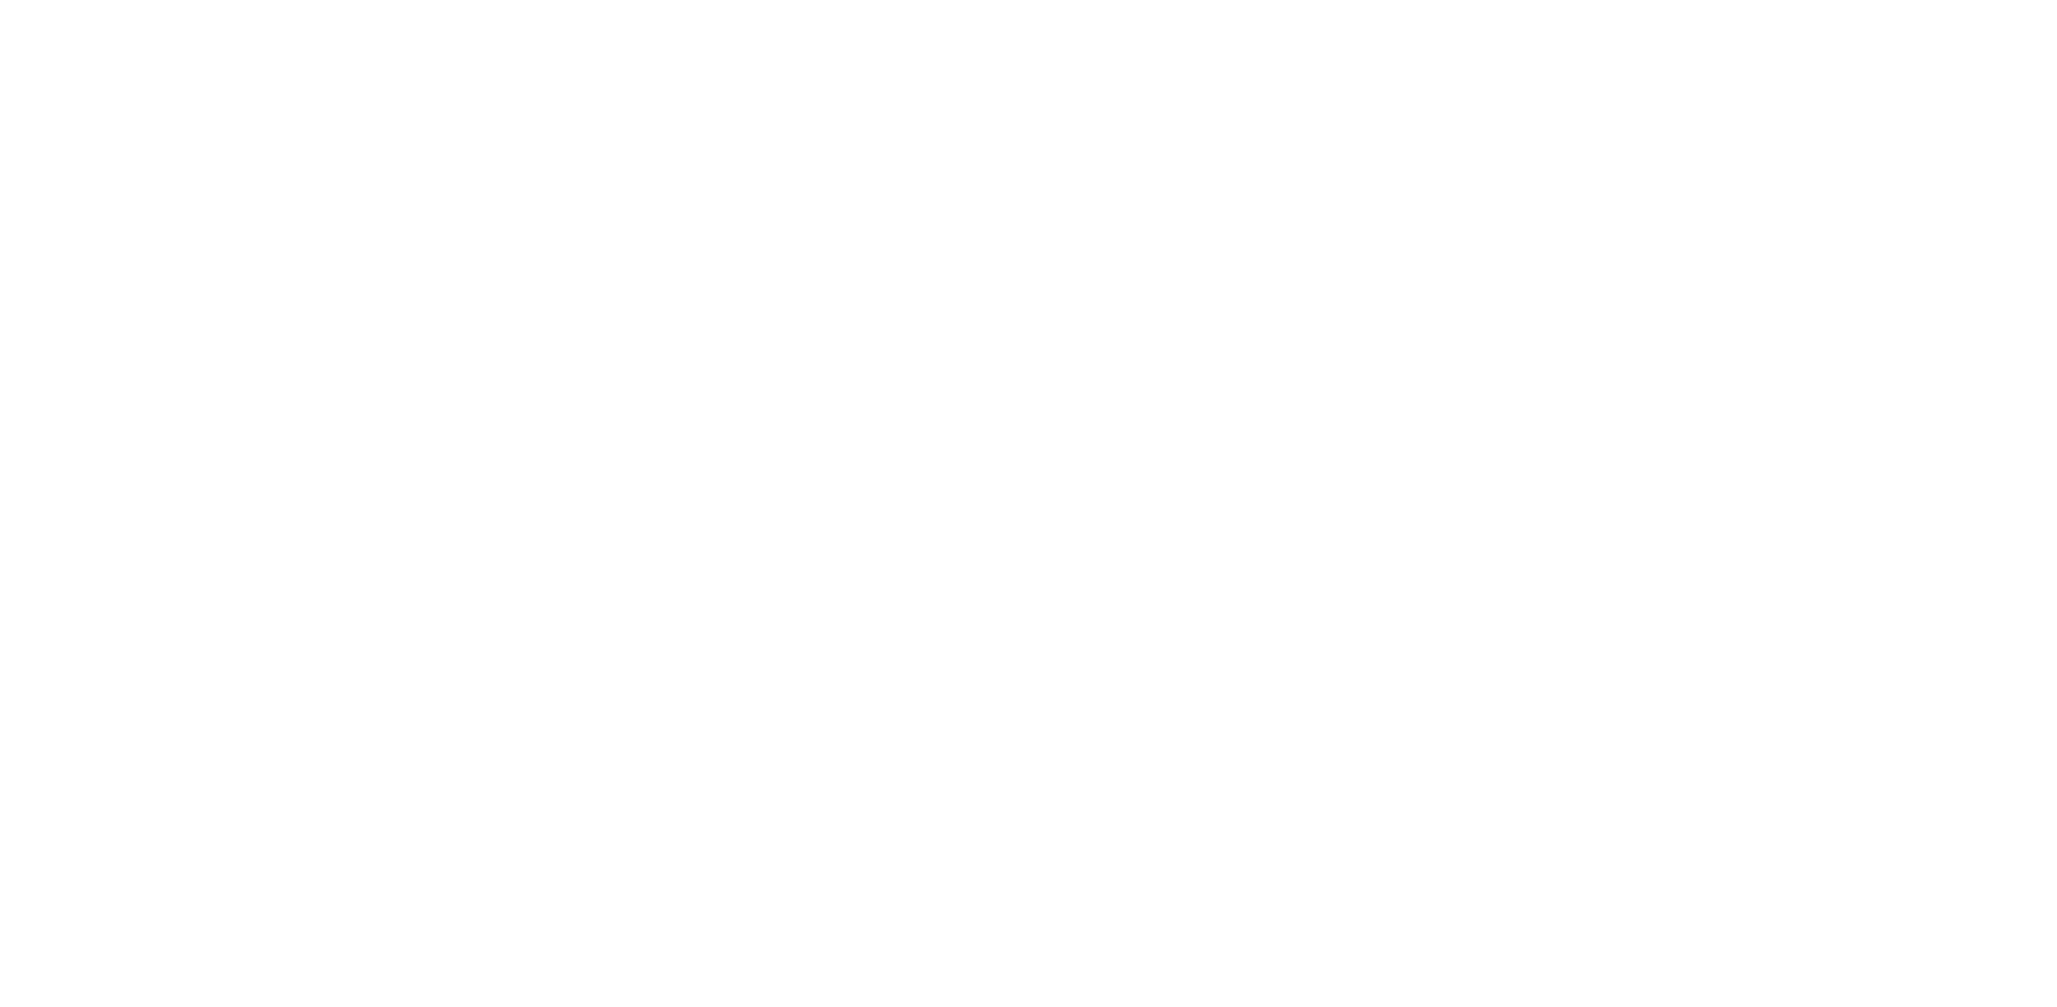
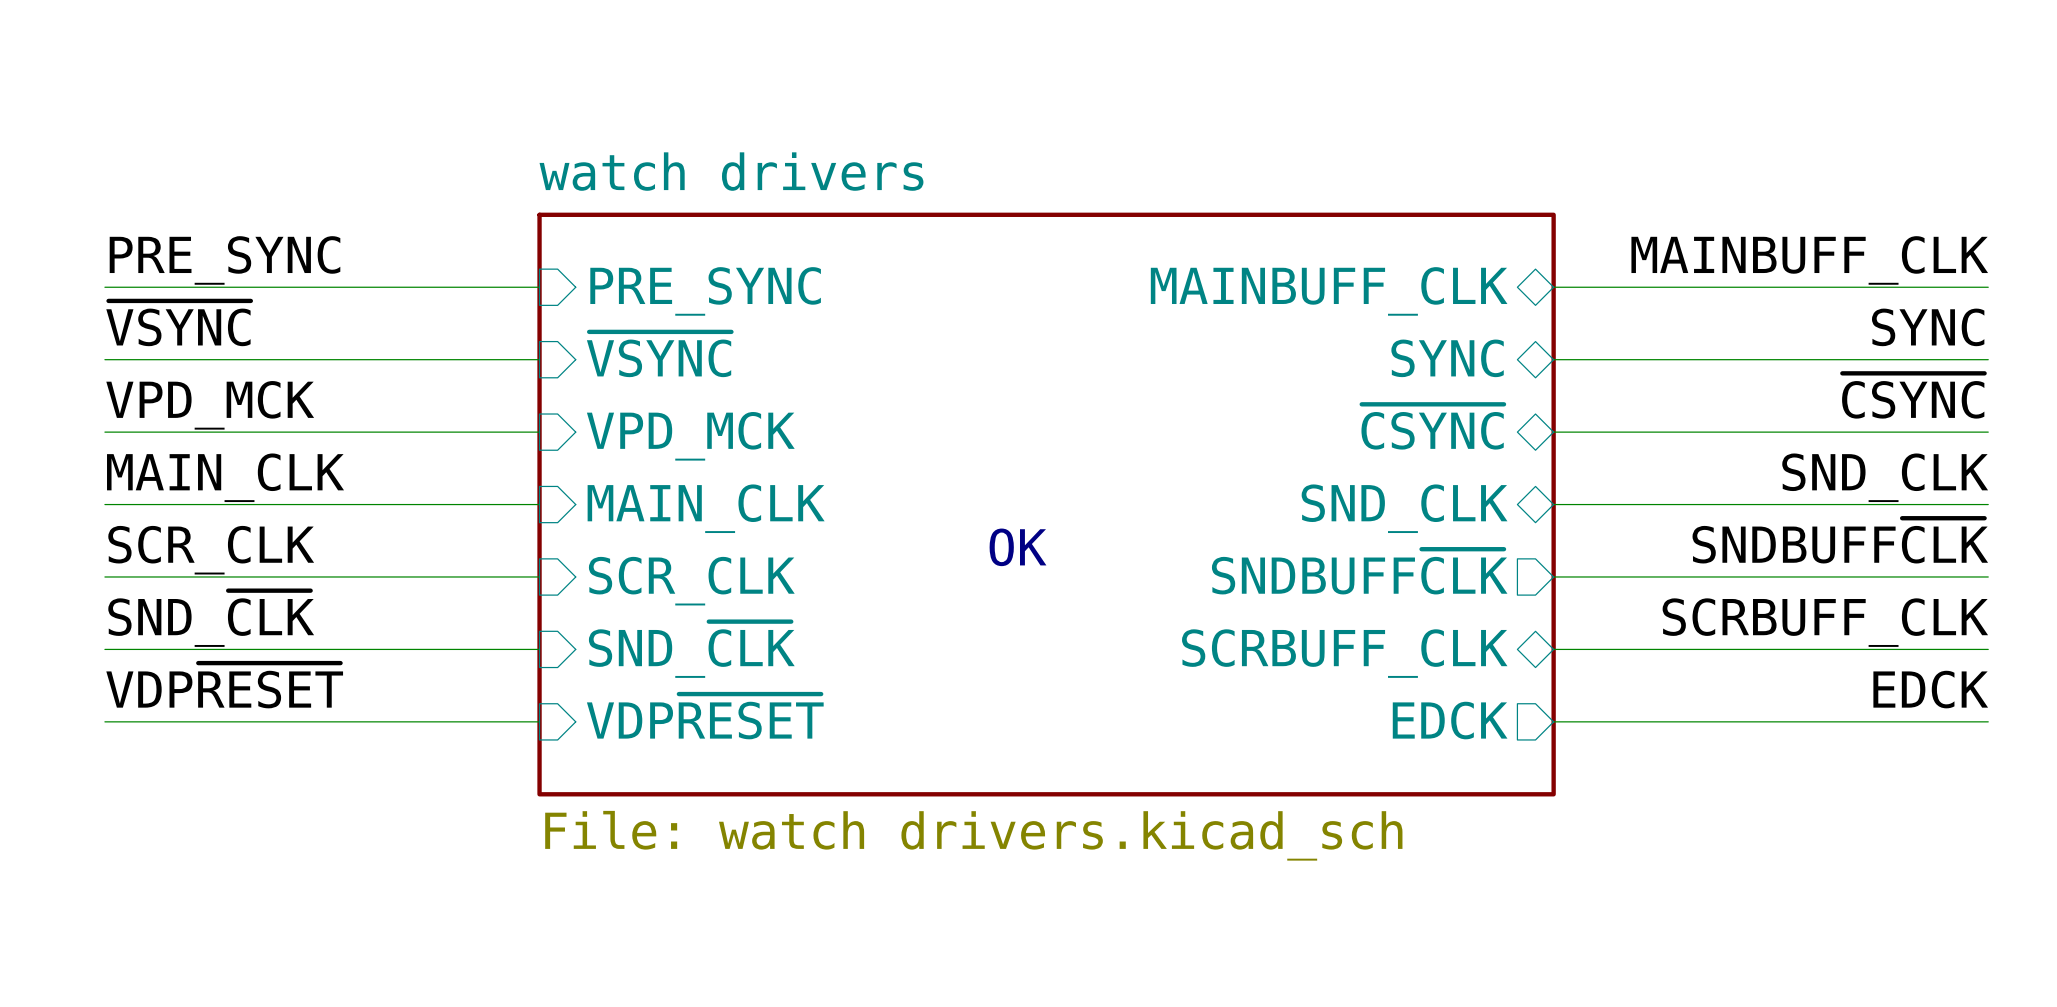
label: none -> PRE_SYNC (225, 260)
label: none -> MAINBUFF_CLK (1809, 260)
wire: none -> (104, 287) (539, 287)
wire: none -> (1553, 287) (1988, 287)
sheet pin: none -> PRE_SYNC (705, 291)
sheet pin: none -> MAINBUFF_CLK (1329, 291)
label: none -> ~{VSYNC} (178, 323)
label: none -> SYNC (1928, 327)
sheet pin: none -> ~{VSYNC} (659, 354)
sheet pin: none -> SYNC (1447, 358)
wire: none -> (104, 359) (539, 359)
wire: none -> (1553, 359) (1988, 359)
label: none -> ~{CSYNC} (1913, 395)
label: none -> VPD_MCK (210, 405)
sheet pin: none -> ~{CSYNC} (1432, 426)
wire: none -> (104, 432) (539, 432)
wire: none -> (1553, 432) (1988, 432)
sheet pin: none -> VPD_MCK (690, 436)
label: none -> MAIN_CLK (225, 477)
label: none -> SND_CLK (1885, 477)
wire: none -> (104, 504) (539, 504)
sheet watch drivers: none -> File: watch drivers.kicad_sch (1046, 504)
wire: none -> (1553, 504) (1988, 504)
sheet pin: none -> MAIN_CLK (706, 508)
sheet pin: none -> SND_CLK (1404, 508)
label: none -> SNDBUFF~{CLK} (1840, 540)
text: none -> OK (1018, 547)
label: none -> SCR_CLK (211, 550)
sheet pin: none -> SNDBUFF~{CLK} (1359, 571)
wire: none -> (104, 576) (539, 576)
wire: none -> (1553, 576) (1988, 576)
sheet pin: none -> SCR_CLK (691, 581)
label: none -> SND_~{CLK} (211, 618)
label: none -> SCRBUFF_CLK (1825, 622)
wire: none -> (104, 649) (539, 649)
sheet pin: none -> SND_~{CLK} (691, 649)
wire: none -> (1553, 649) (1988, 649)
sheet pin: none -> SCRBUFF_CLK (1344, 653)
label: none -> VDP~{RESET} (224, 685)
label: none -> EDCK (1930, 689)
sheet pin: none -> VDP~{RESET} (705, 716)
sheet pin: none -> EDCK (1450, 720)
wire: none -> (104, 721) (539, 721)
wire: none -> (1553, 721) (1988, 721)

